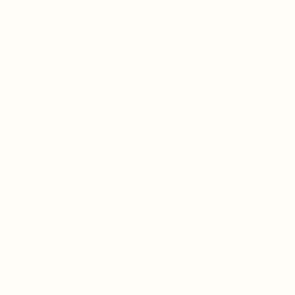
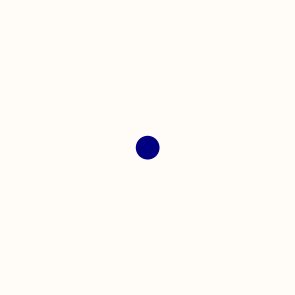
junction: none -> (147, 147)

